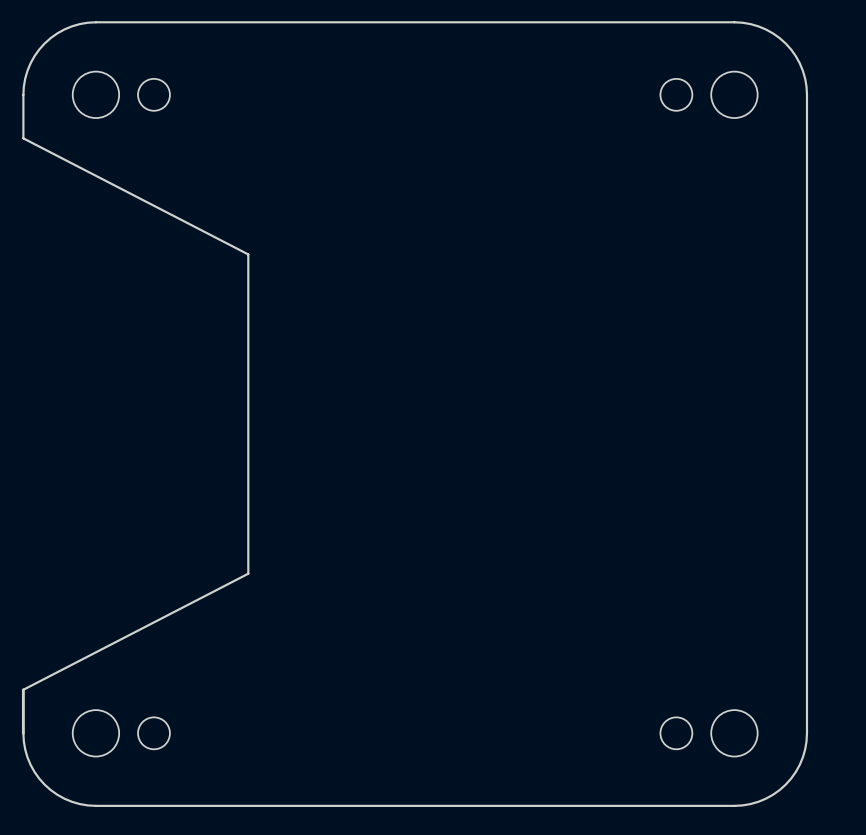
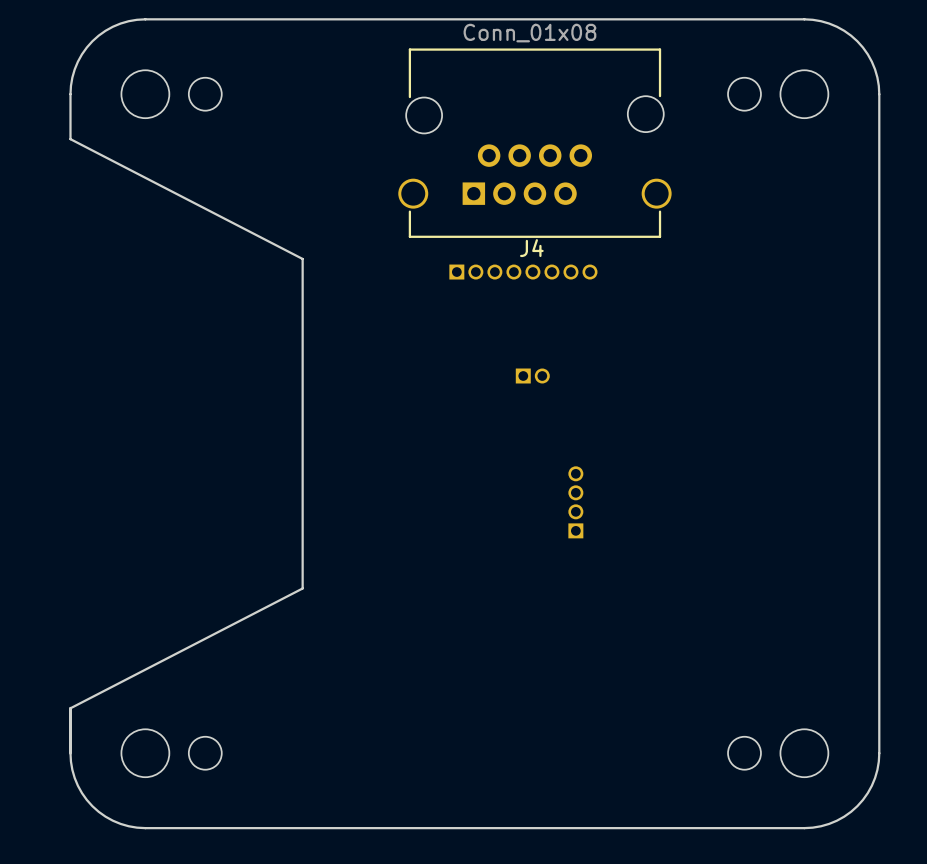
J4: none -> Conn_01x08 (534, 143)
part: none -> (523, 272)
part: none -> (532, 376)
part: none -> (575, 502)

